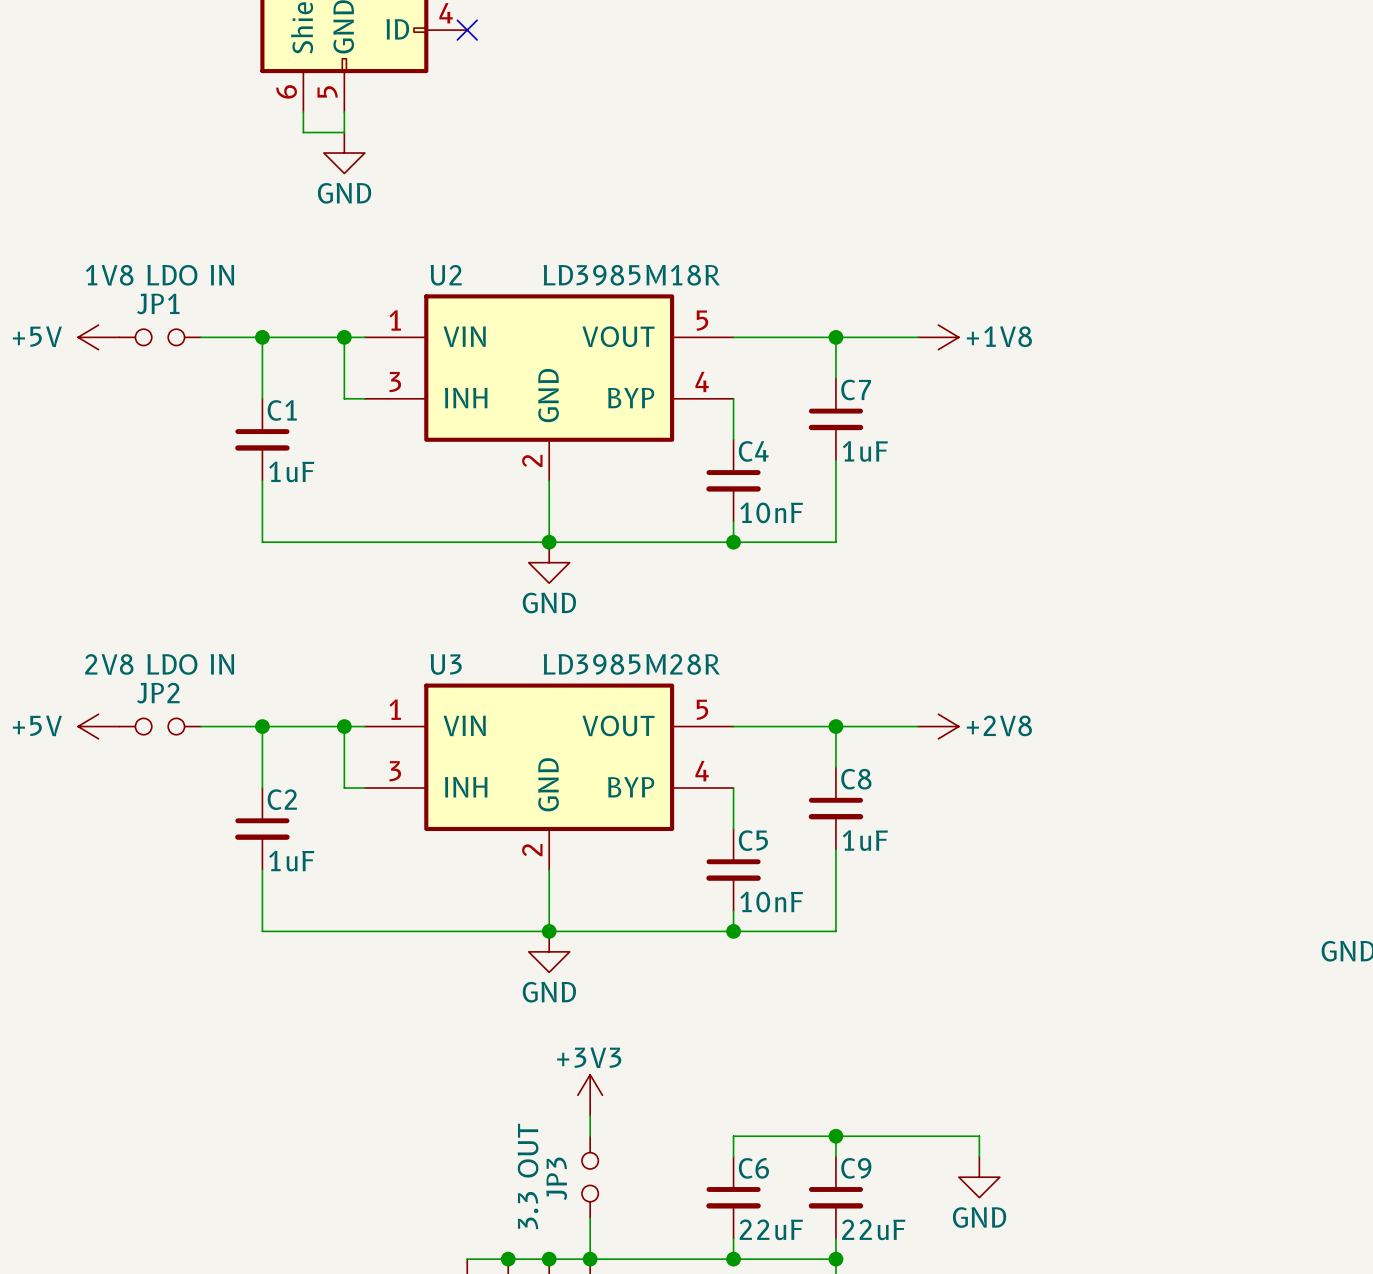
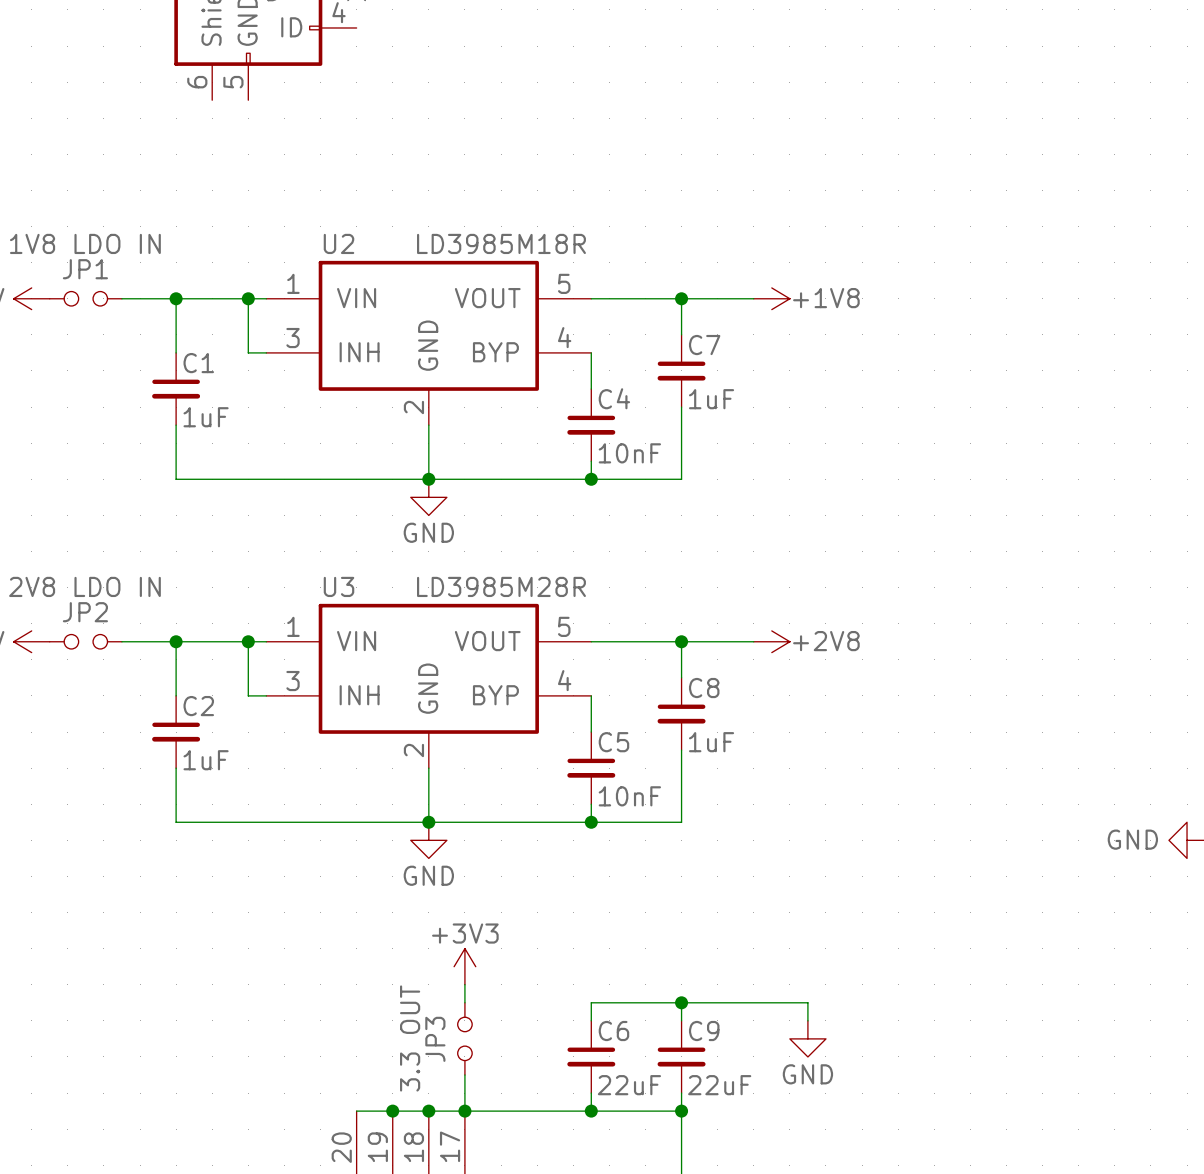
no-connect mark: (467, 30) -> none
wire: (303, 112) (303, 132) (344, 132) (344, 112) -> none
power symbol: GND (344, 153) -> none

